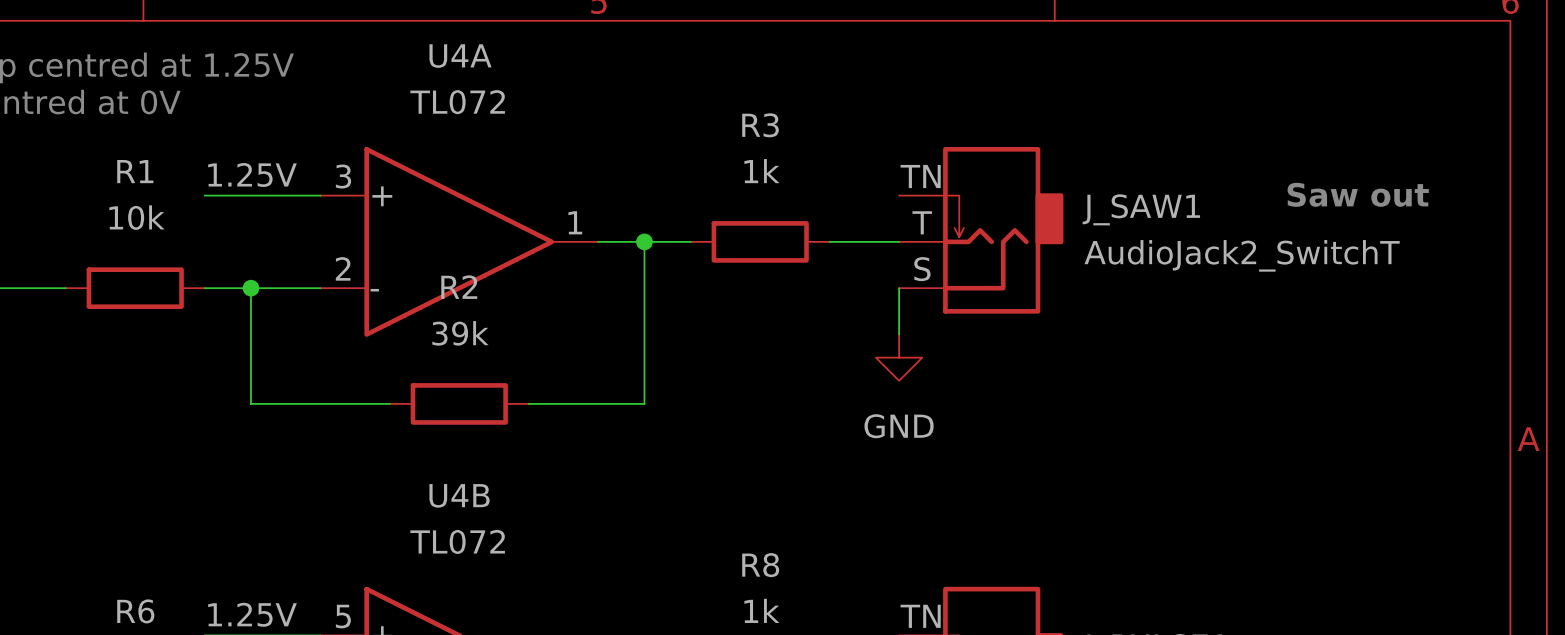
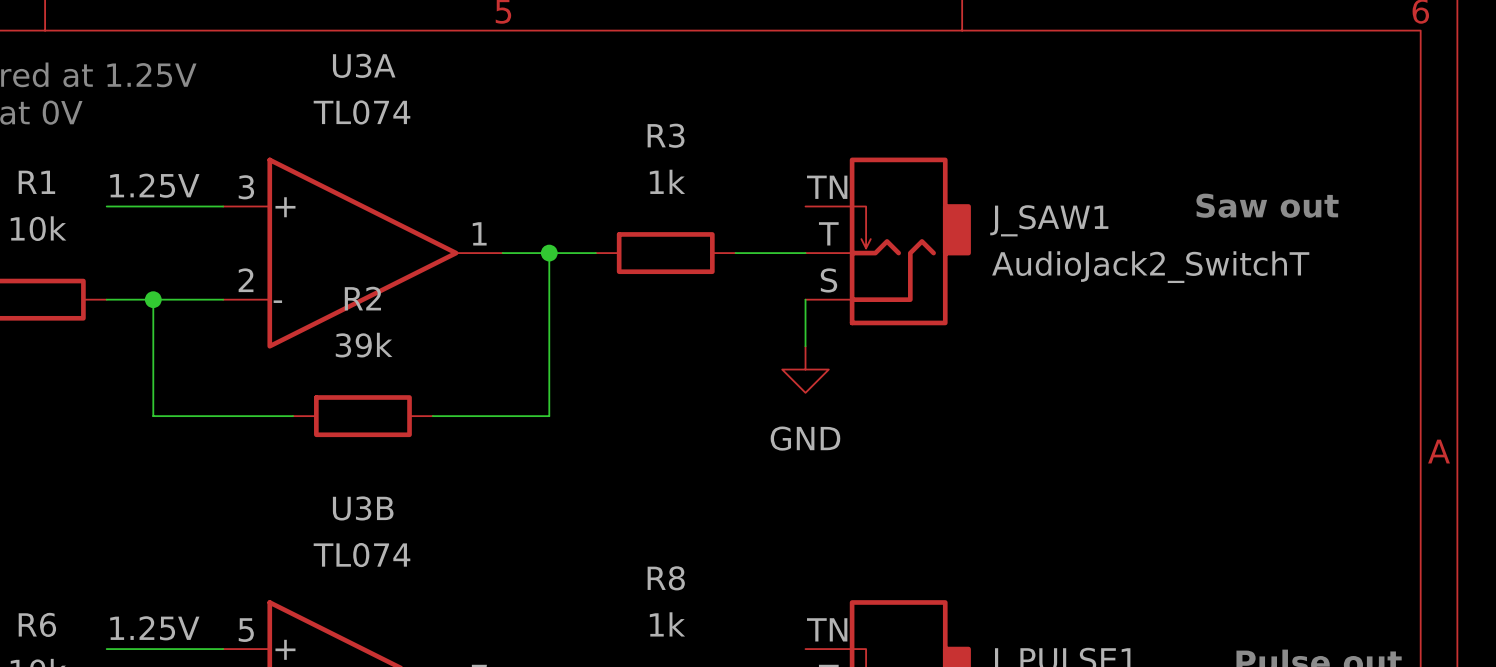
U4A name: U4A (460, 56) -> U3A (364, 65)
U4A value: TL072 (457, 102) -> TL074 (361, 112)
U4B name: U4B (459, 495) -> U3B (363, 508)
U4B value: TL072 (457, 541) -> TL074 (361, 555)

